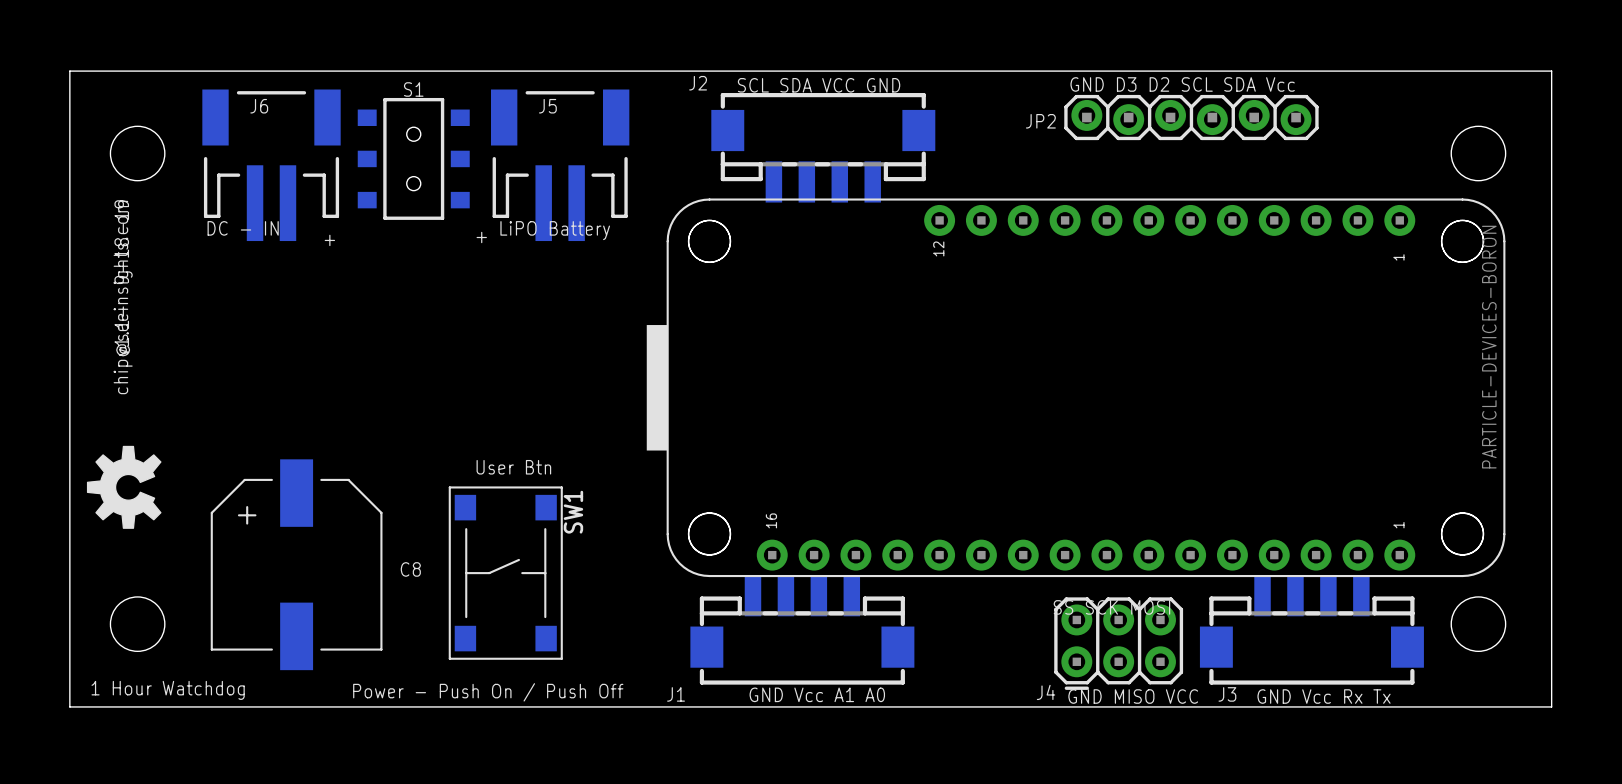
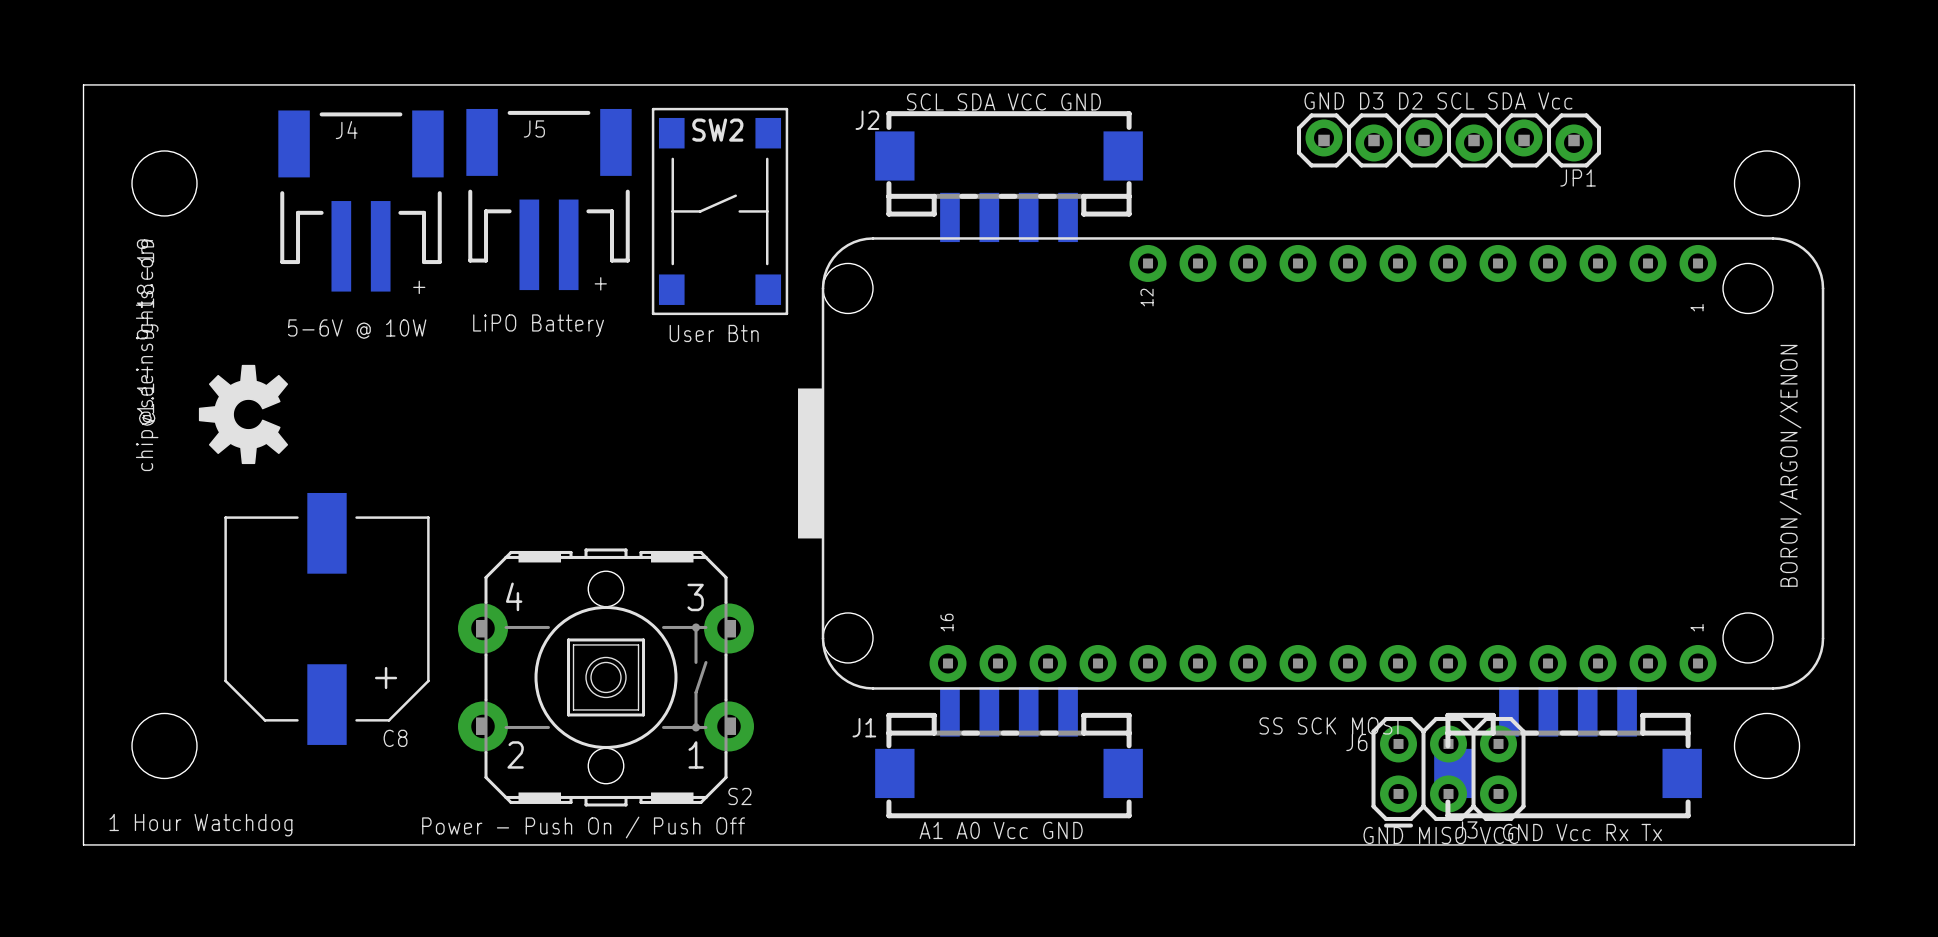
J2 name position: J2 (698, 83) -> J2 (867, 120)
text position: GND D3 D2 SCL SDA Vcc (1182, 84) -> GND D3 D2 SCL SDA Vcc (1438, 100)
text position: SCL SDA VCC GND (819, 85) -> SCL SDA VCC GND (1003, 101)
J6 footprint: [202, 89, 341, 242] -> [1371, 716, 1526, 828]
J6 name position: J6 (259, 106) -> J6 (1356, 742)
JP2: (1191, 117) -> none
JP1: none -> (1449, 140)
J2 position: (823, 147) -> (1009, 176)
S1: (413, 158) -> none
J5 position: (560, 165) -> (549, 199)
SW2: none -> (720, 211)
text: DC - IN (243, 228) -> none
text position: LiPO Battery (555, 230) -> LiPO Battery (538, 325)
text position: + (481, 237) -> + (600, 283)
text position: + (329, 240) -> + (419, 287)
text: none -> 5-6V @ 10W (357, 329)
part: PARTICLE-DEVICES-BORON (1076, 387) -> none
BORON/ARGON/XENON: none -> (1311, 463)
text position: User Btn (513, 467) -> User Btn (714, 333)
drawing position: (124, 487) -> (243, 414)
C8 rotation: 0° (296, 564) -> 180° (327, 618)
S2: none -> (606, 677)
C8 name position: C8 (410, 569) -> C8 (395, 738)
SW1: (505, 573) -> none
J4 footprint: [1054, 597, 1184, 690] -> [278, 110, 444, 292]
J1 position: (802, 629) -> (1009, 752)
J4 name position: J4 (1046, 692) -> J4 (346, 130)
J1 name position: J1 (676, 694) -> J1 (864, 727)
text: GND Vcc A1 A0 (817, 694) -> none
text: none -> A1 A0 Vcc GND (1001, 830)
text position: GND MISO VCC (1133, 696) -> GND MISO VCC (1440, 835)

